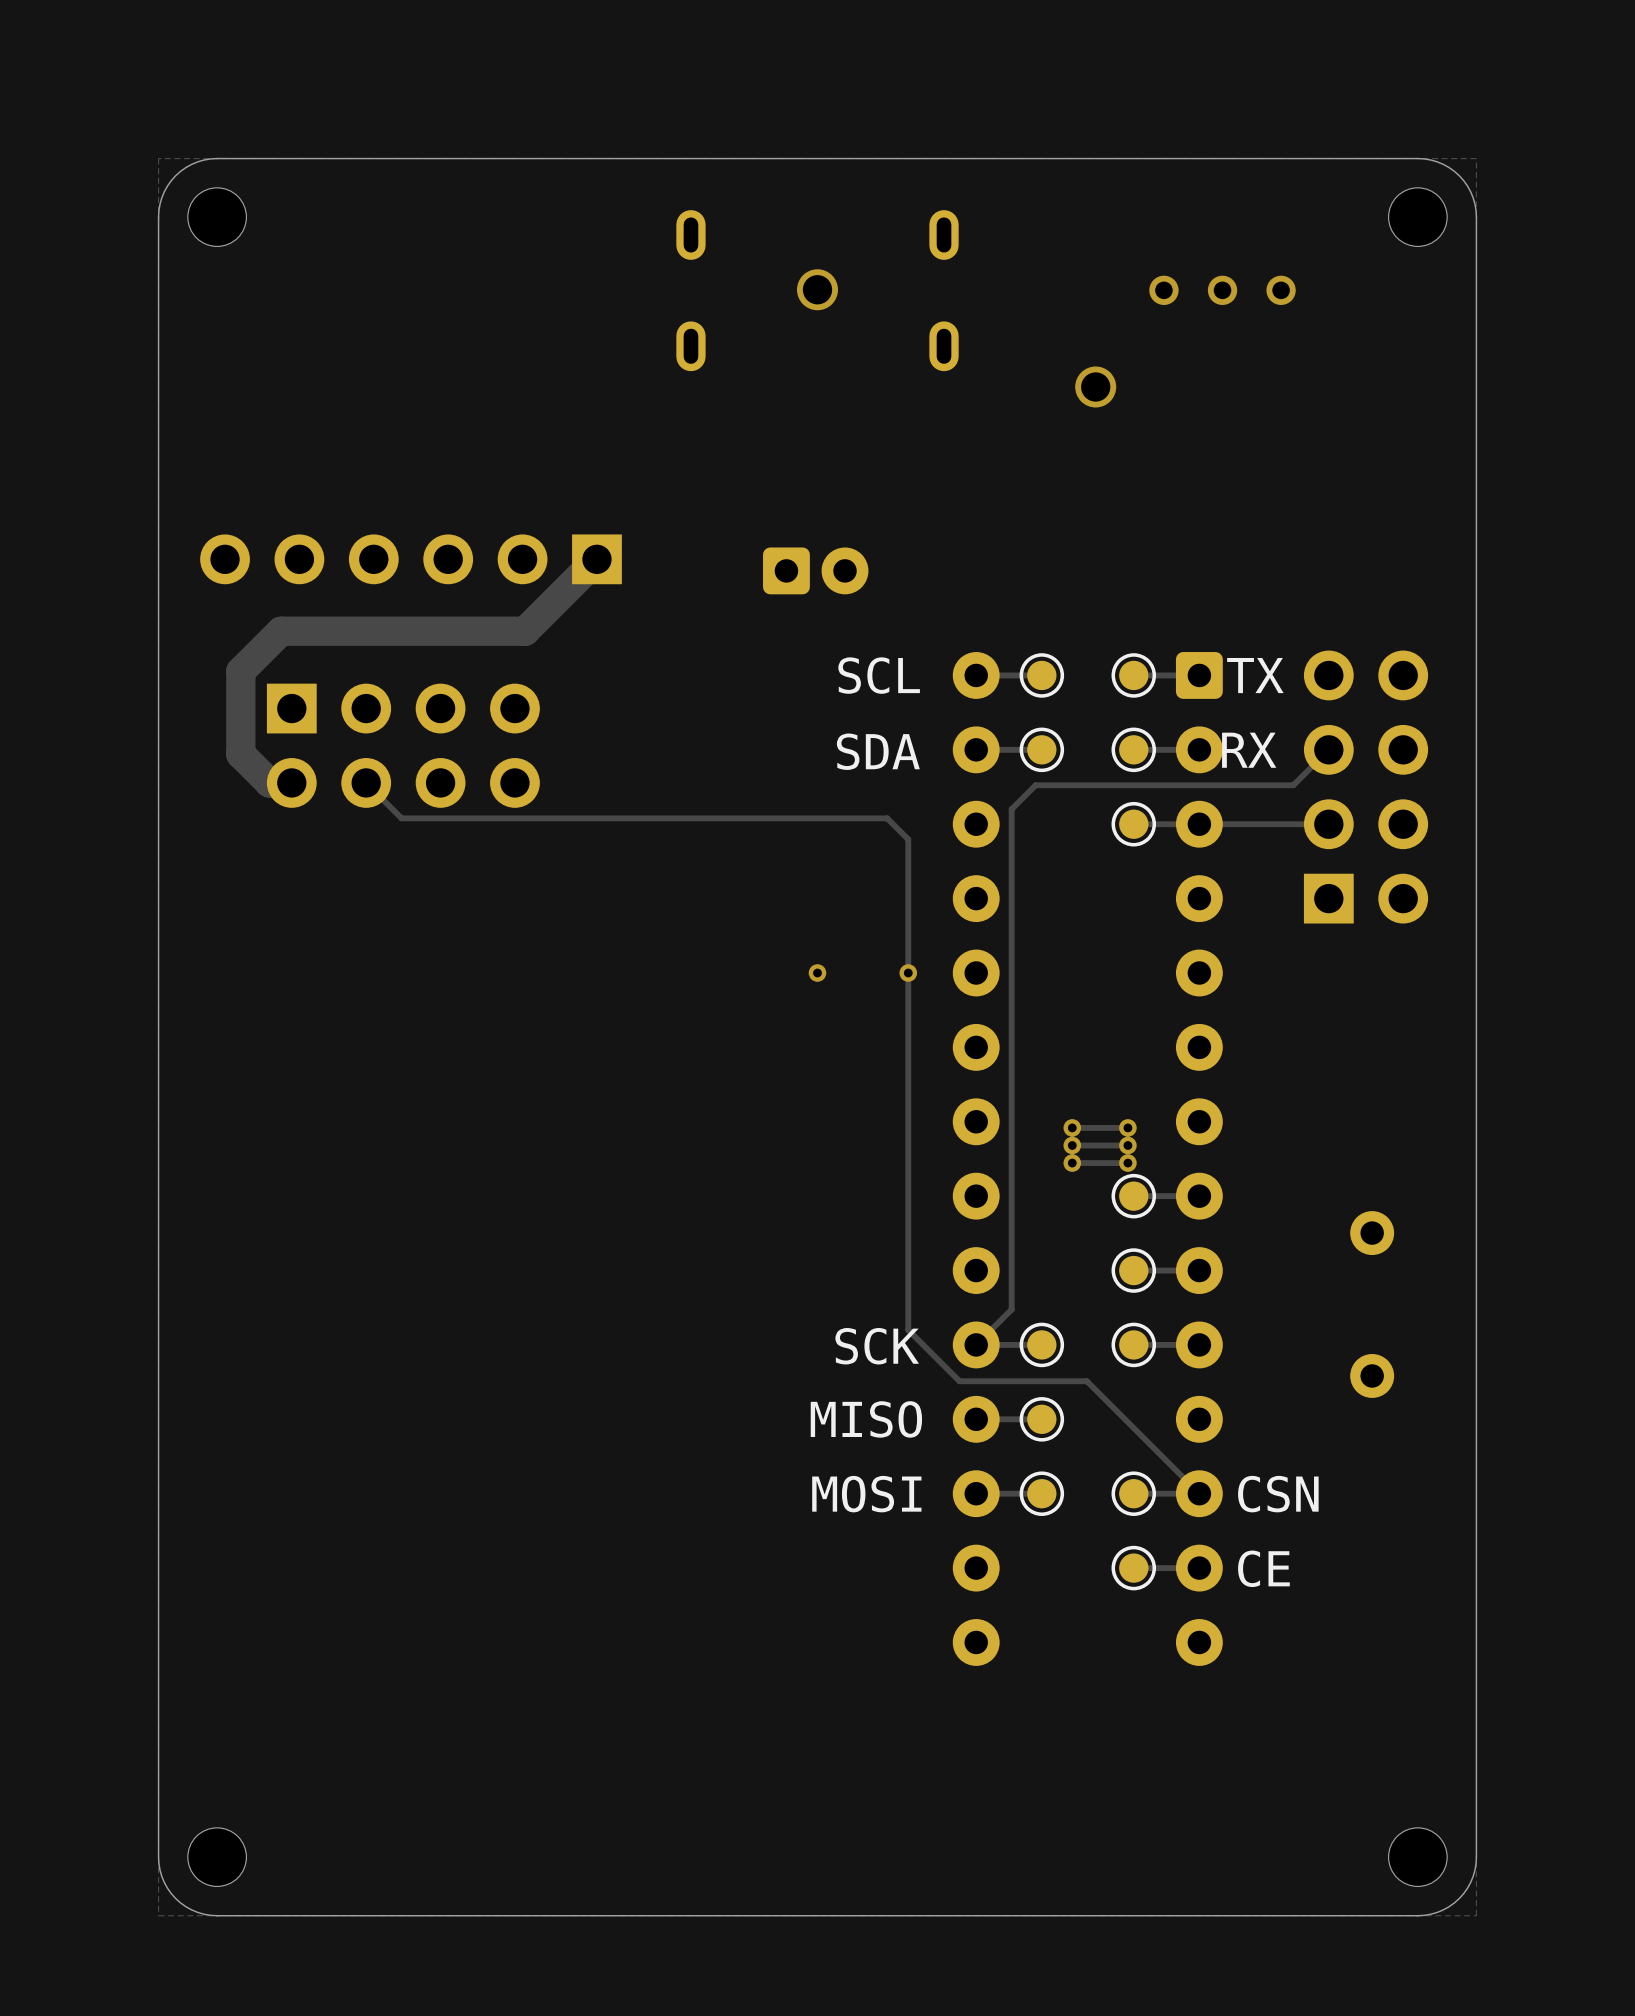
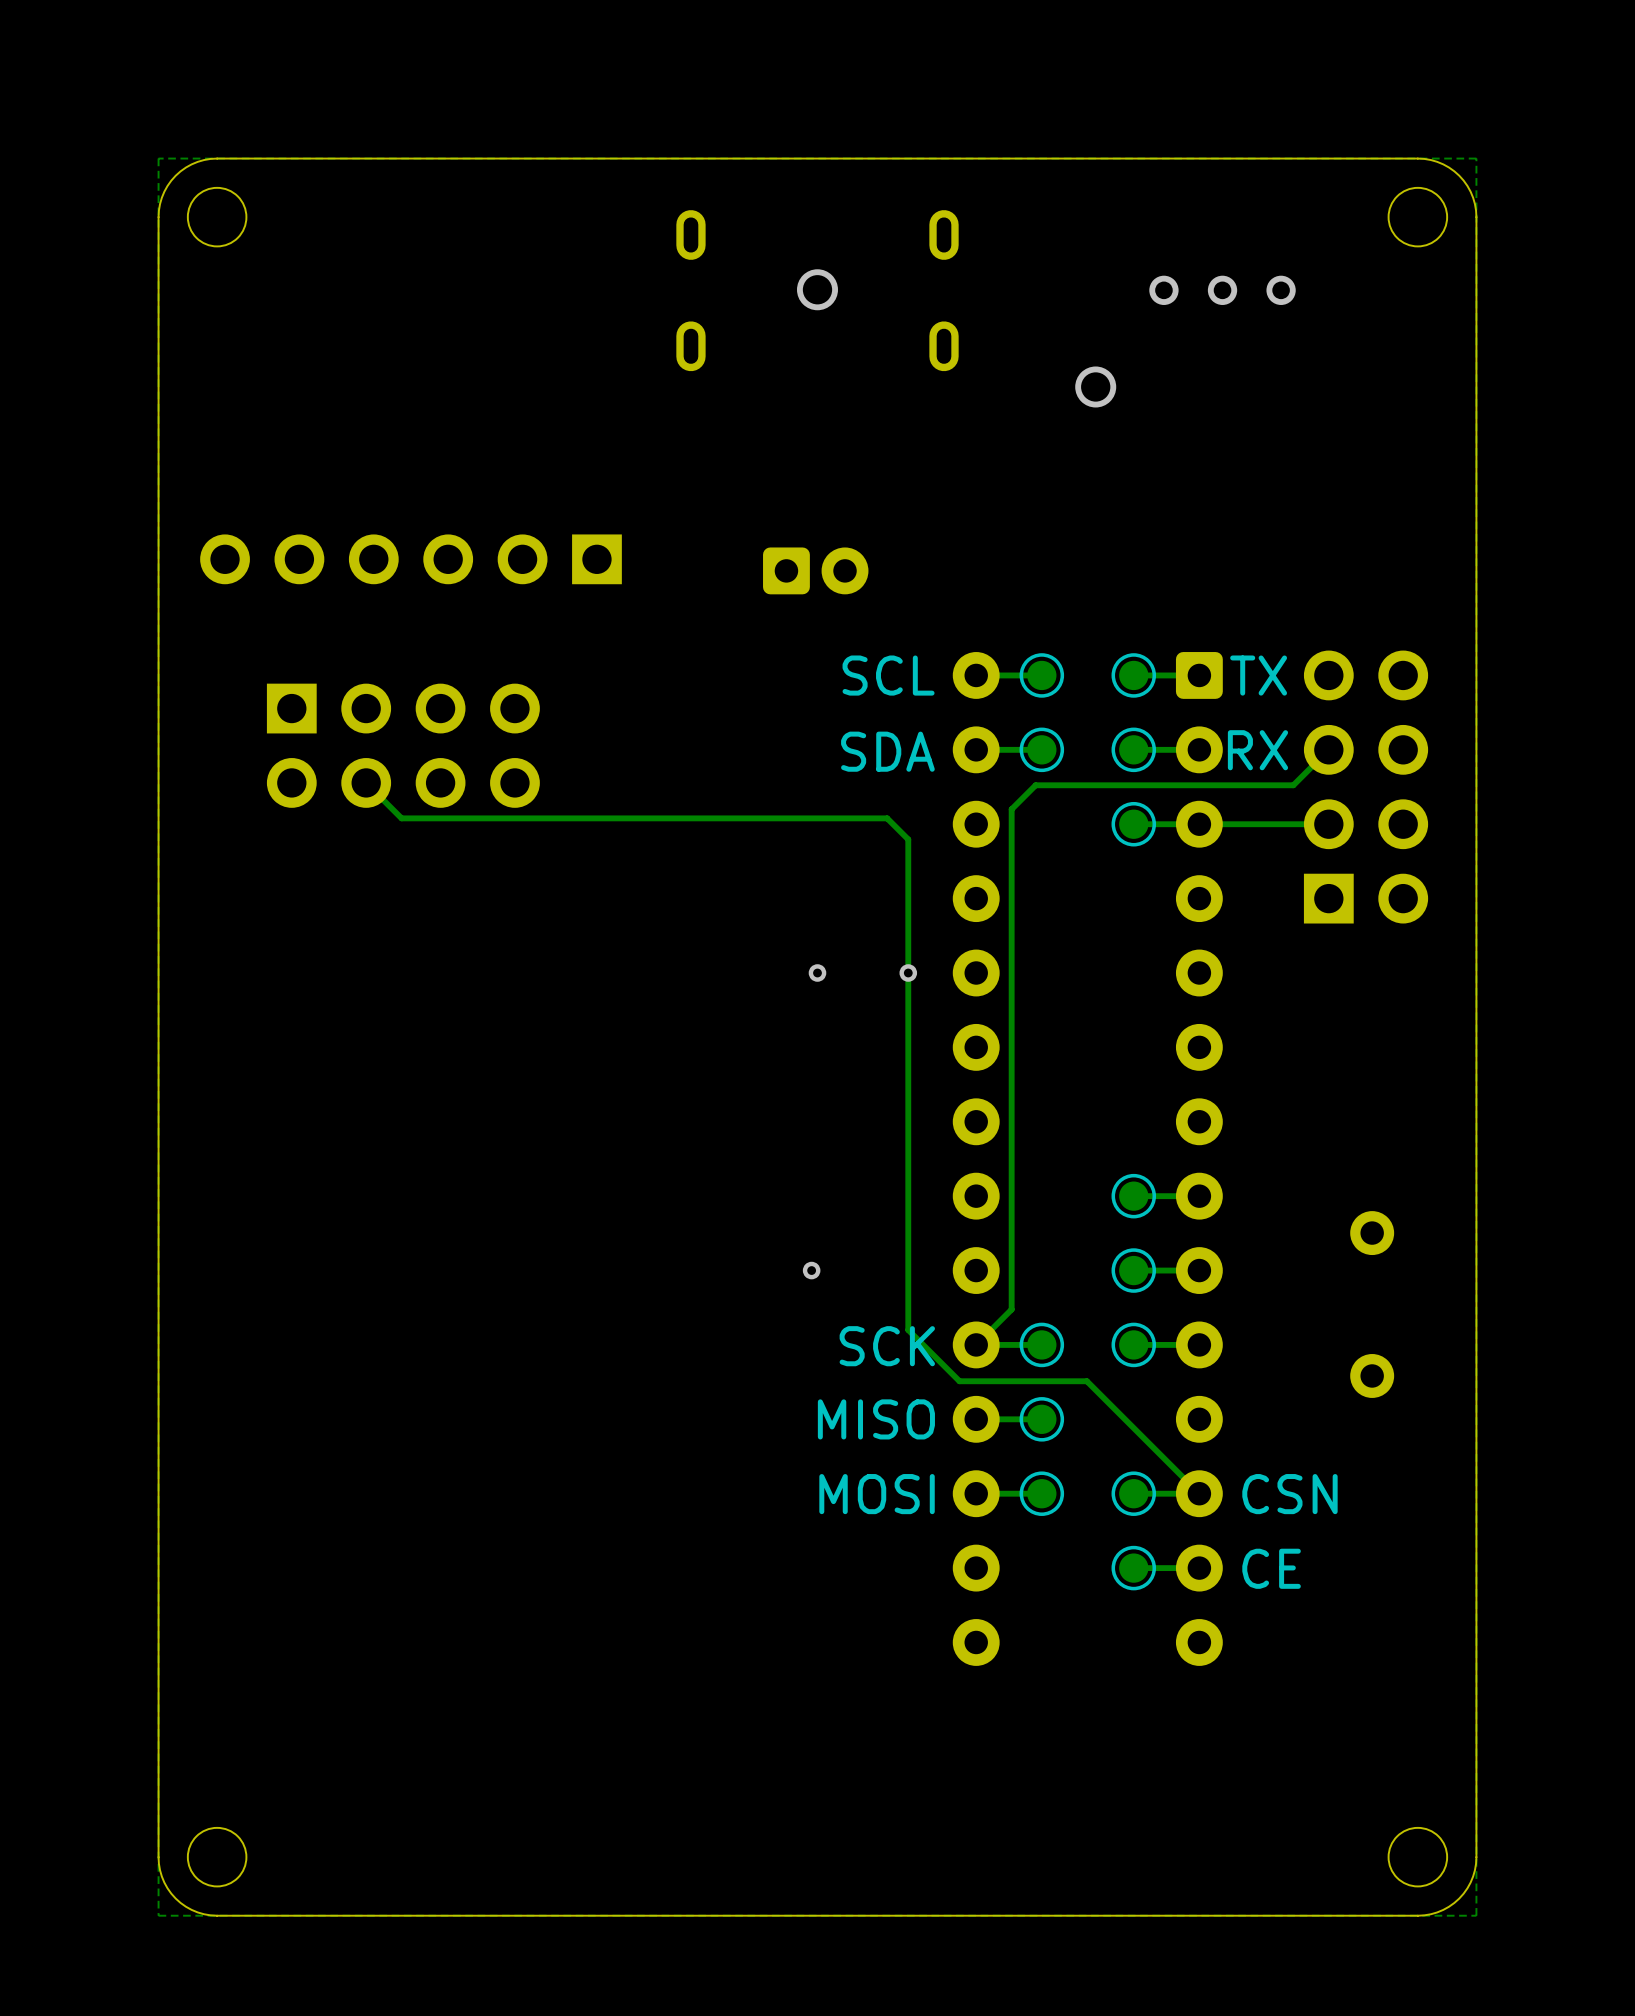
track: (596, 559) (525, 631) (280, 631) (240, 671) (240, 754) (269, 782) (291, 782) -> none
via: (1072, 1127) -> none
track: (1127, 1127) (1072, 1127) -> none
via: (1127, 1127) -> none
via: (1072, 1145) -> none
track: (1127, 1145) (1072, 1145) -> none
via: (1127, 1145) -> none
via: (1072, 1163) -> none
track: (1127, 1163) (1072, 1163) -> none
via: (1127, 1163) -> none
via: none -> (811, 1270)

